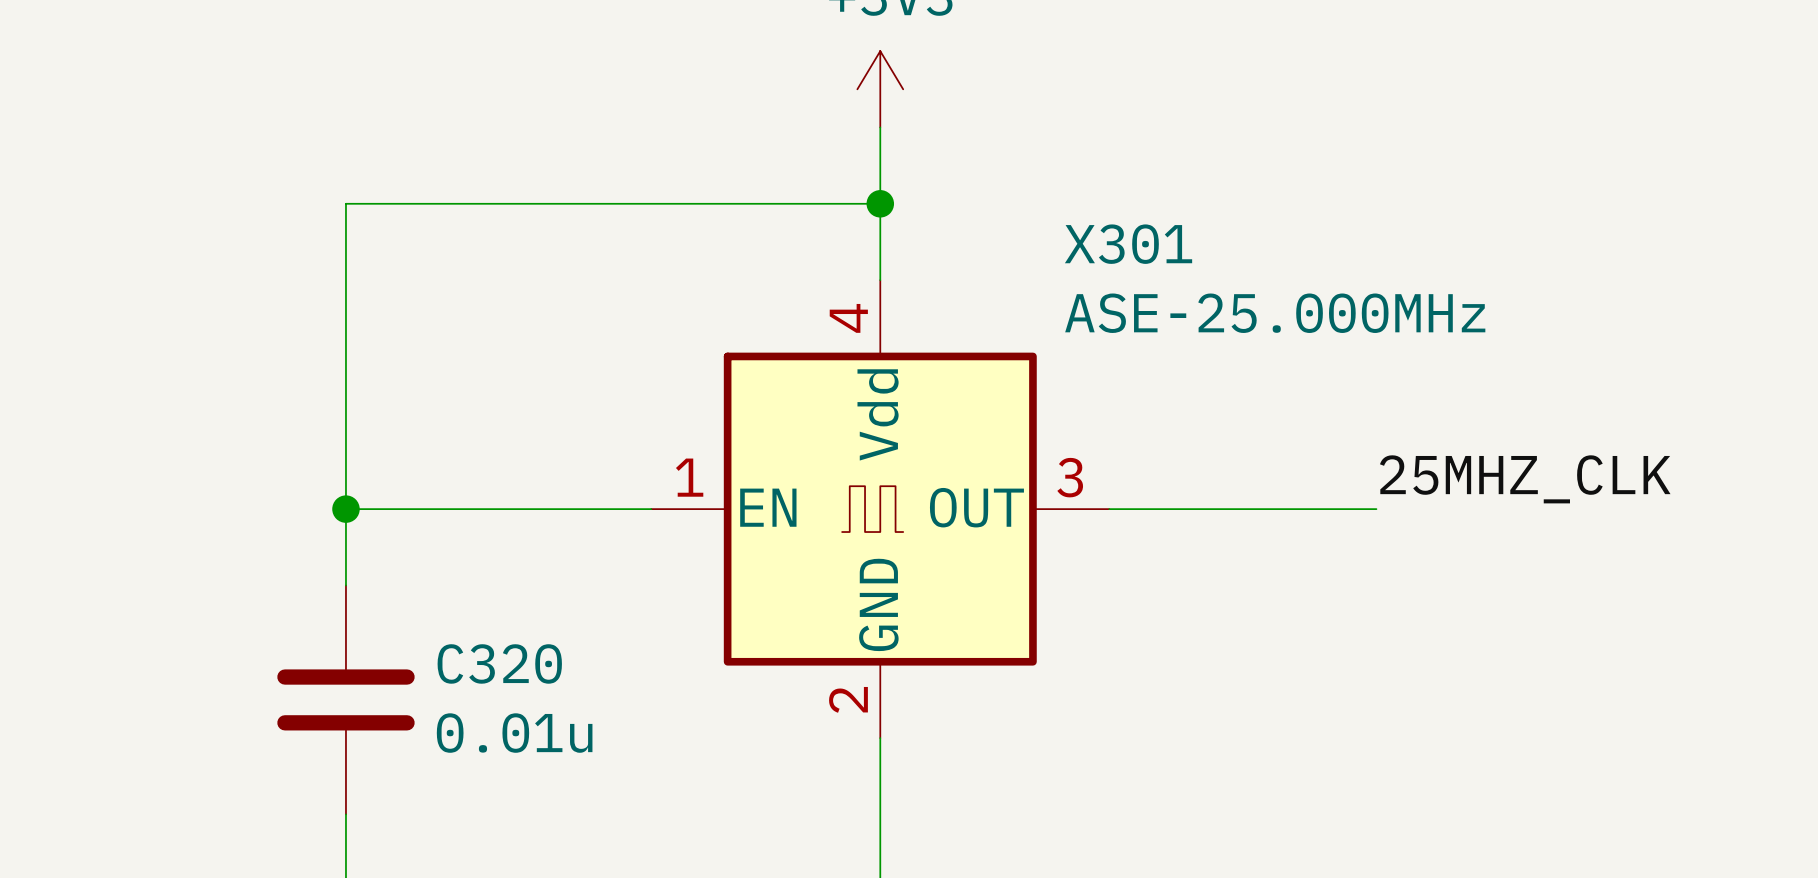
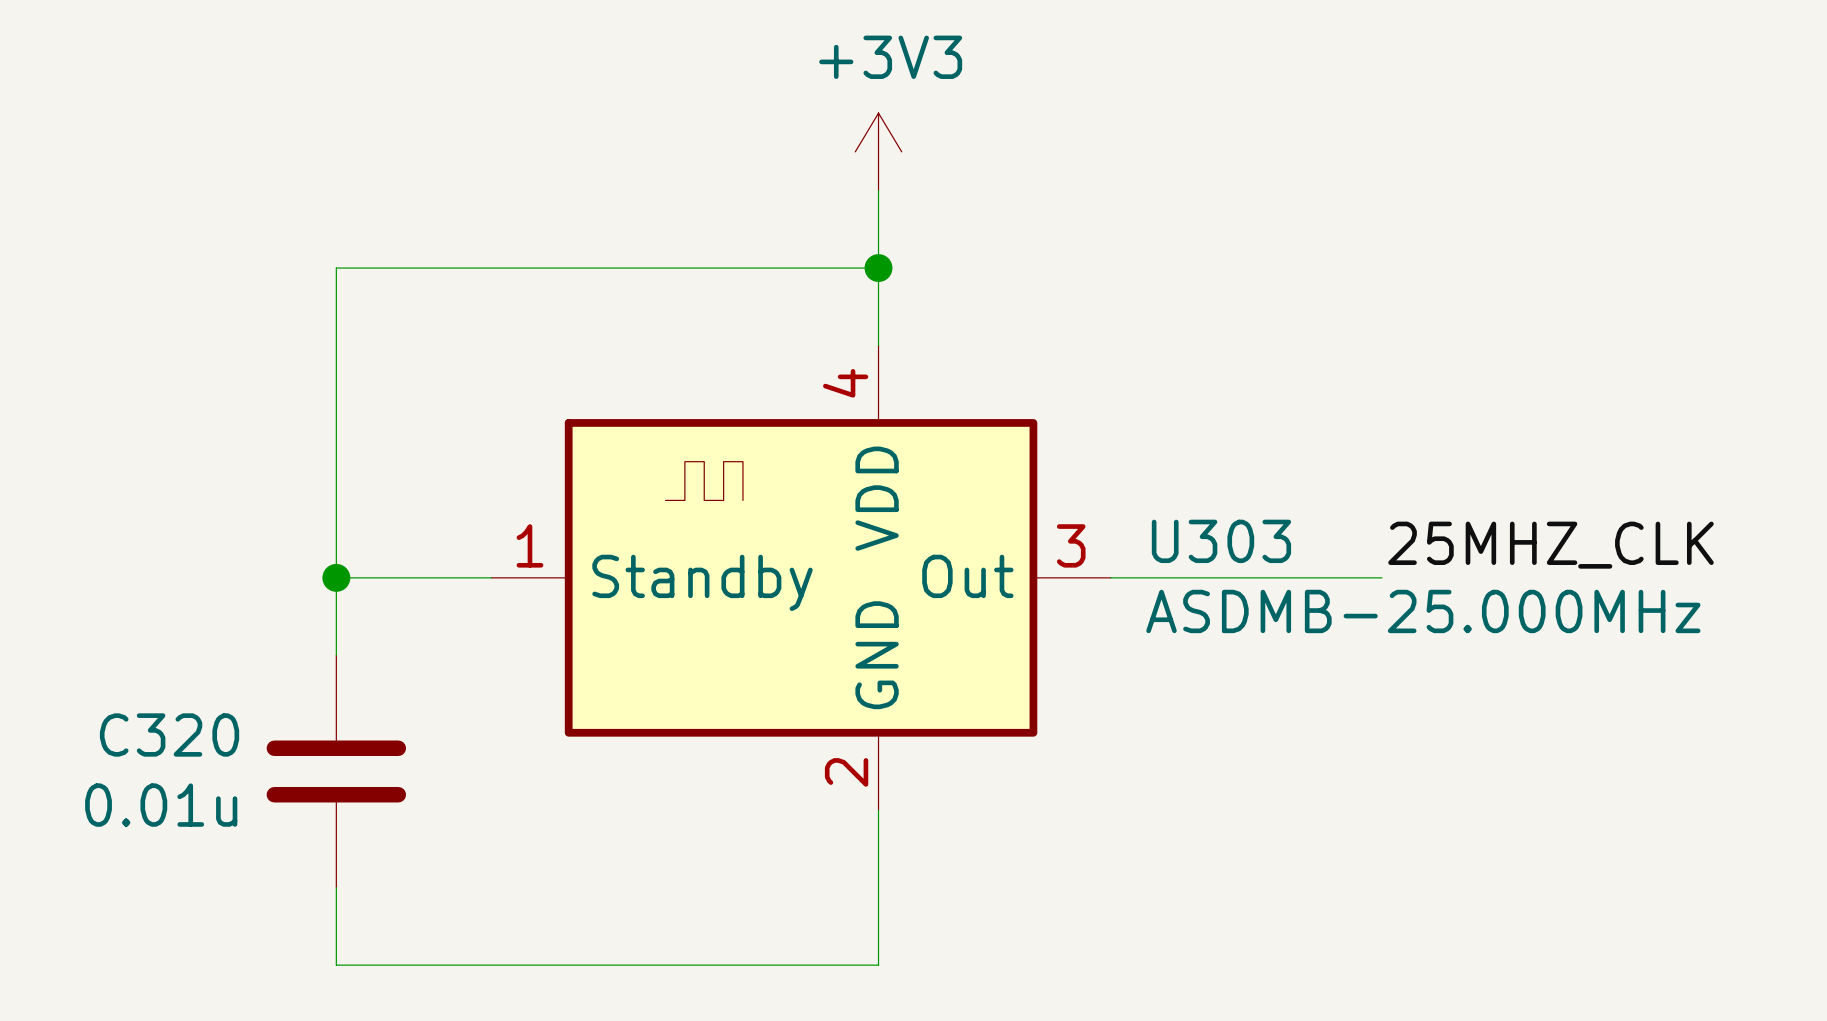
U303: none -> ASDMB-25.000MHz (801, 577)
X301: ASE-25.000MHz (880, 509) -> none
C320 name position: C320 (499, 663) -> C320 (169, 735)
C320 value position: 0.01u (514, 733) -> 0.01u (161, 805)

